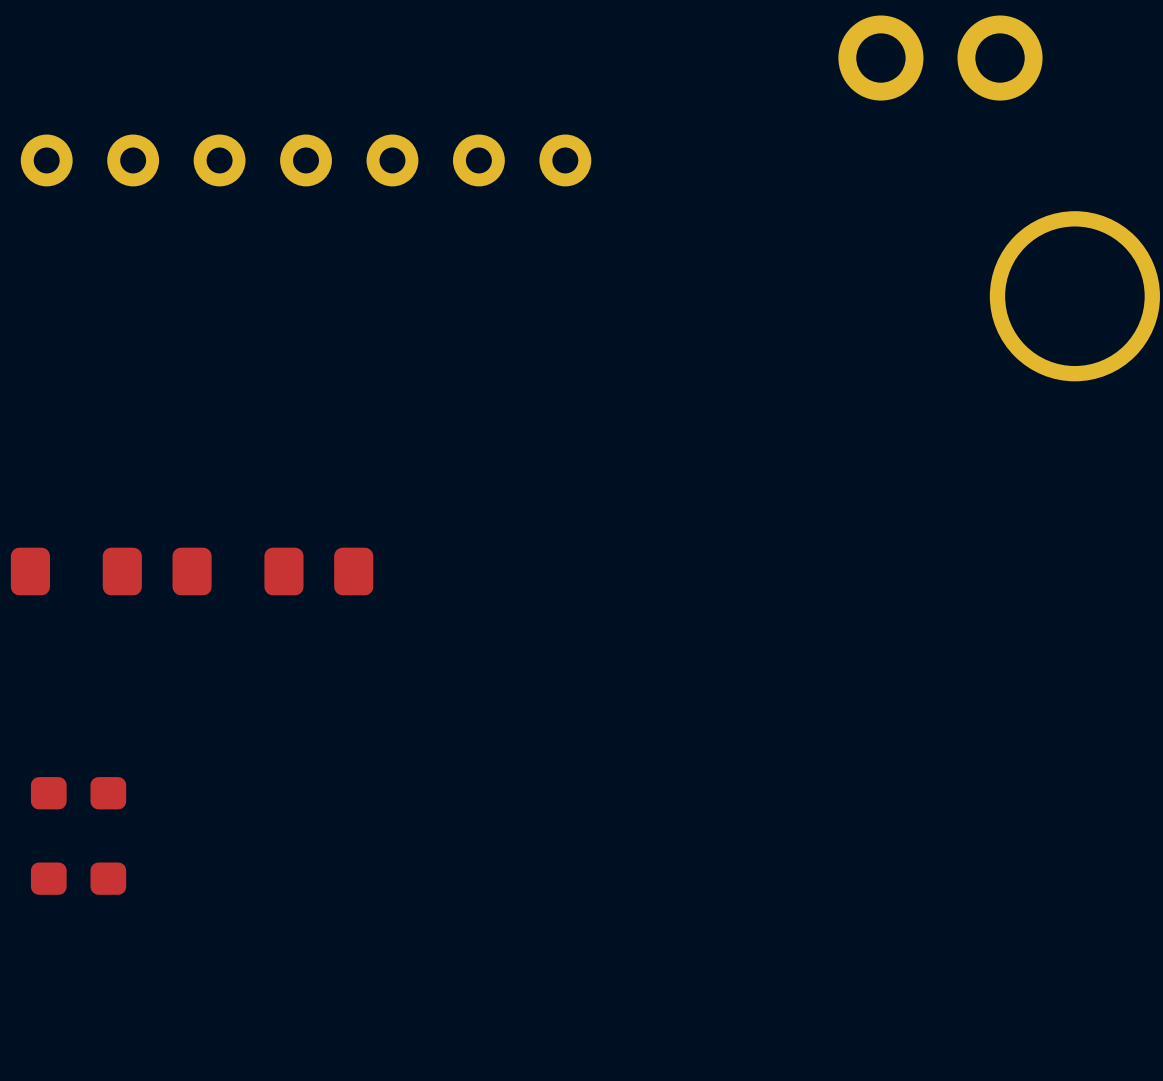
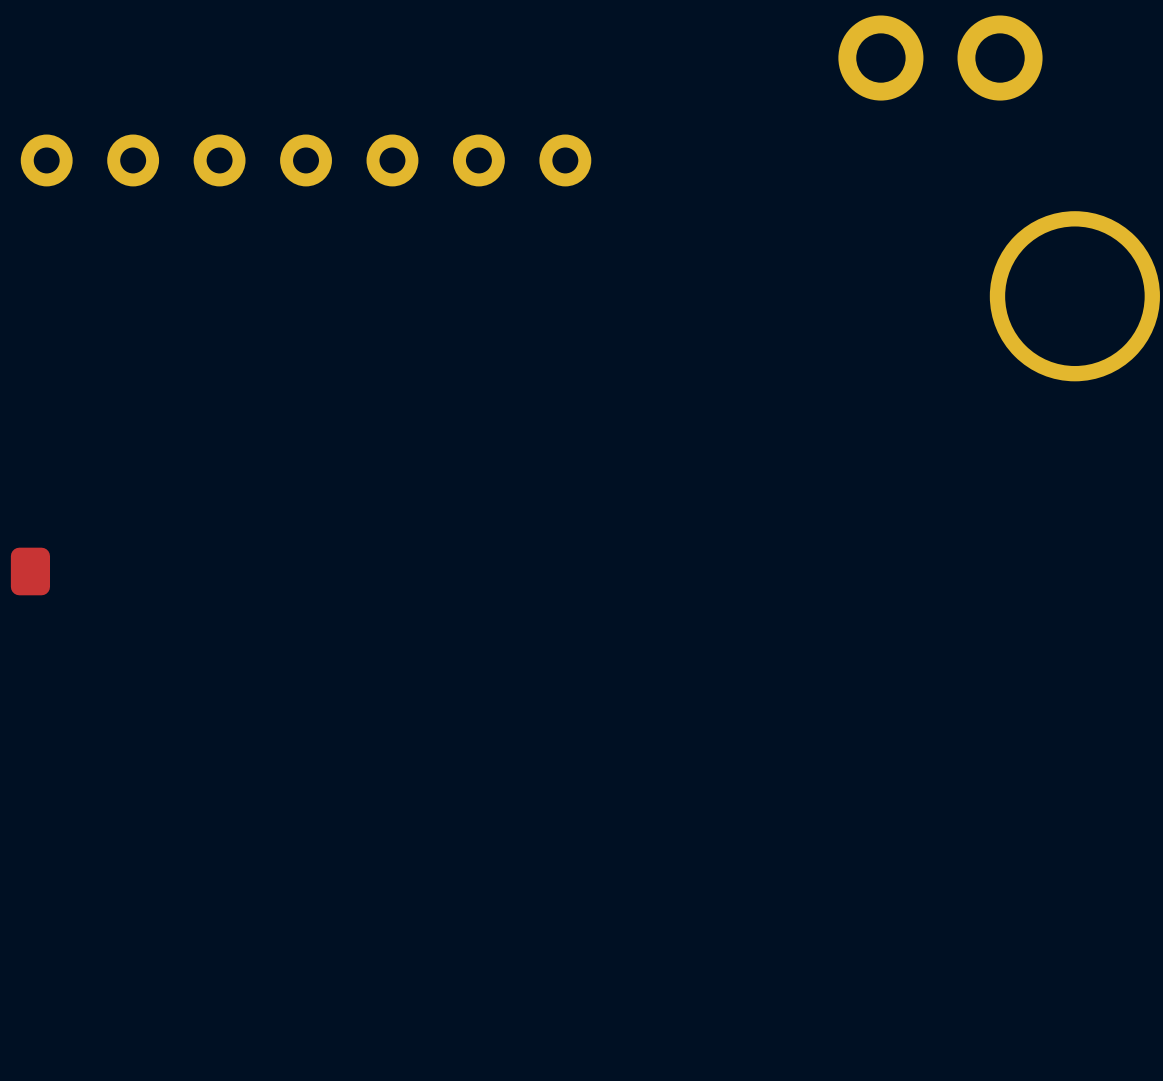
part: (157, 571) -> none
part: (318, 571) -> none
part: (78, 793) -> none
part: (78, 878) -> none

